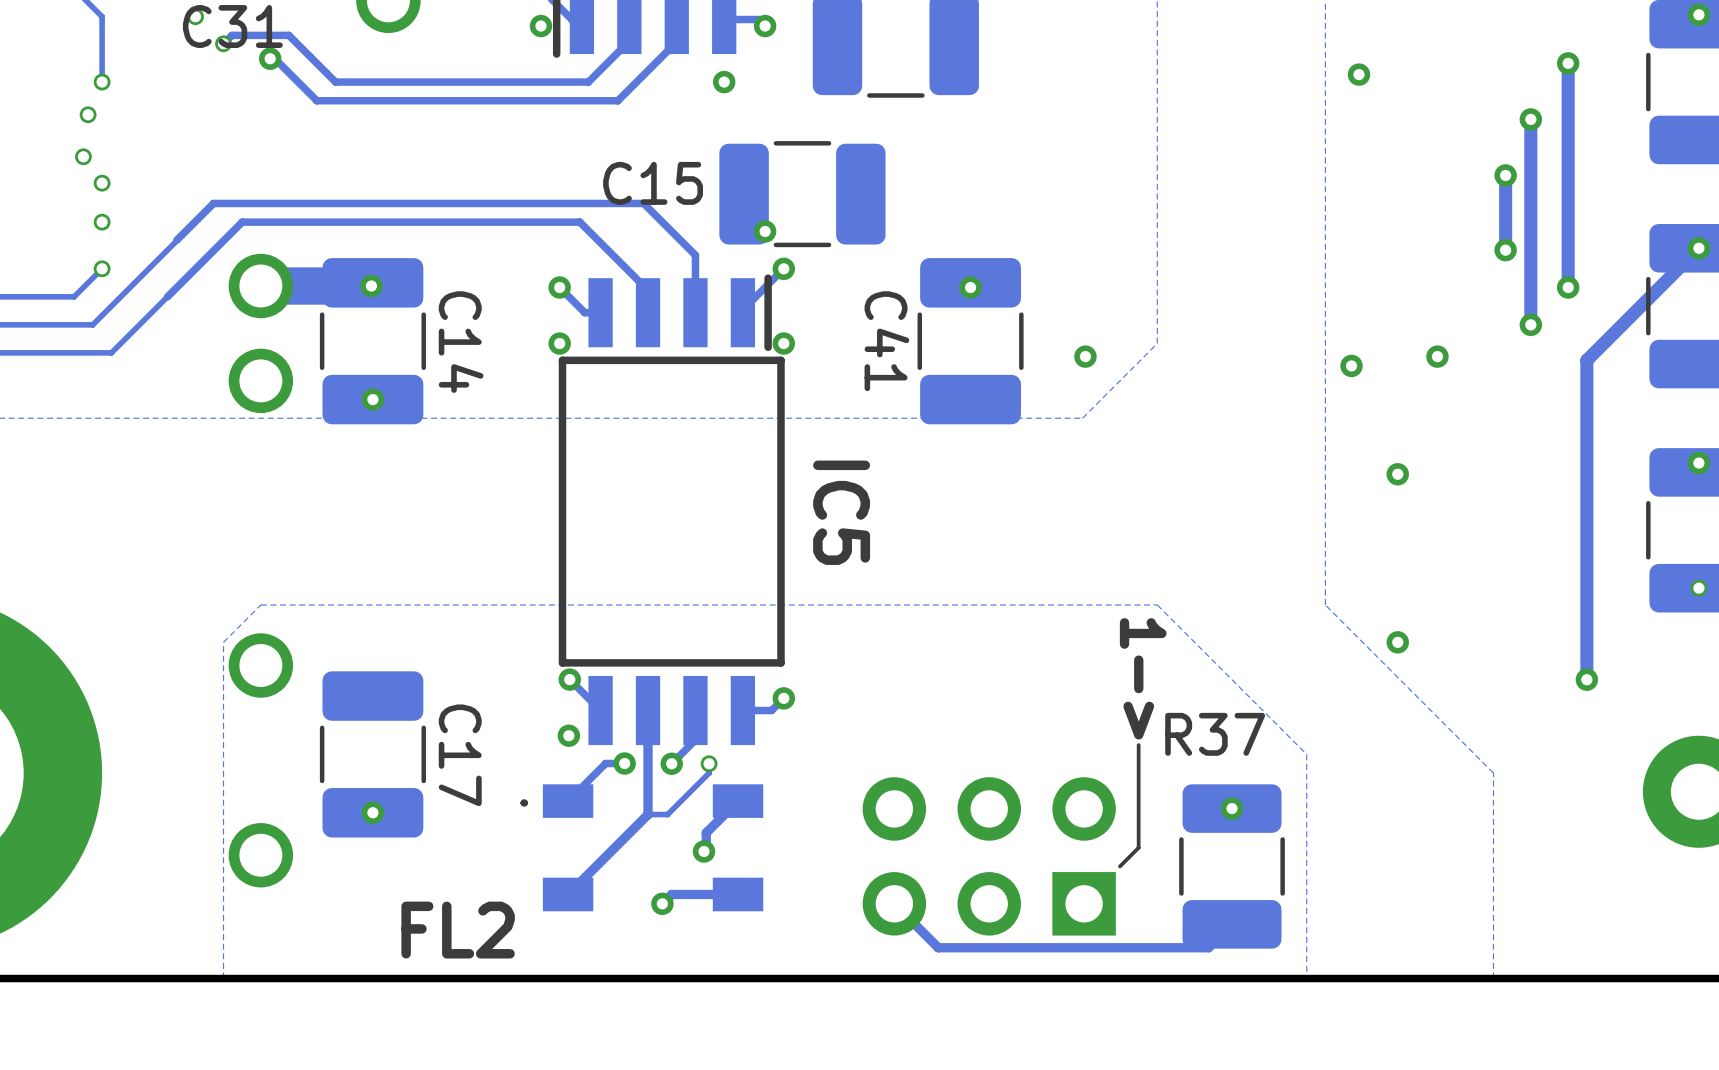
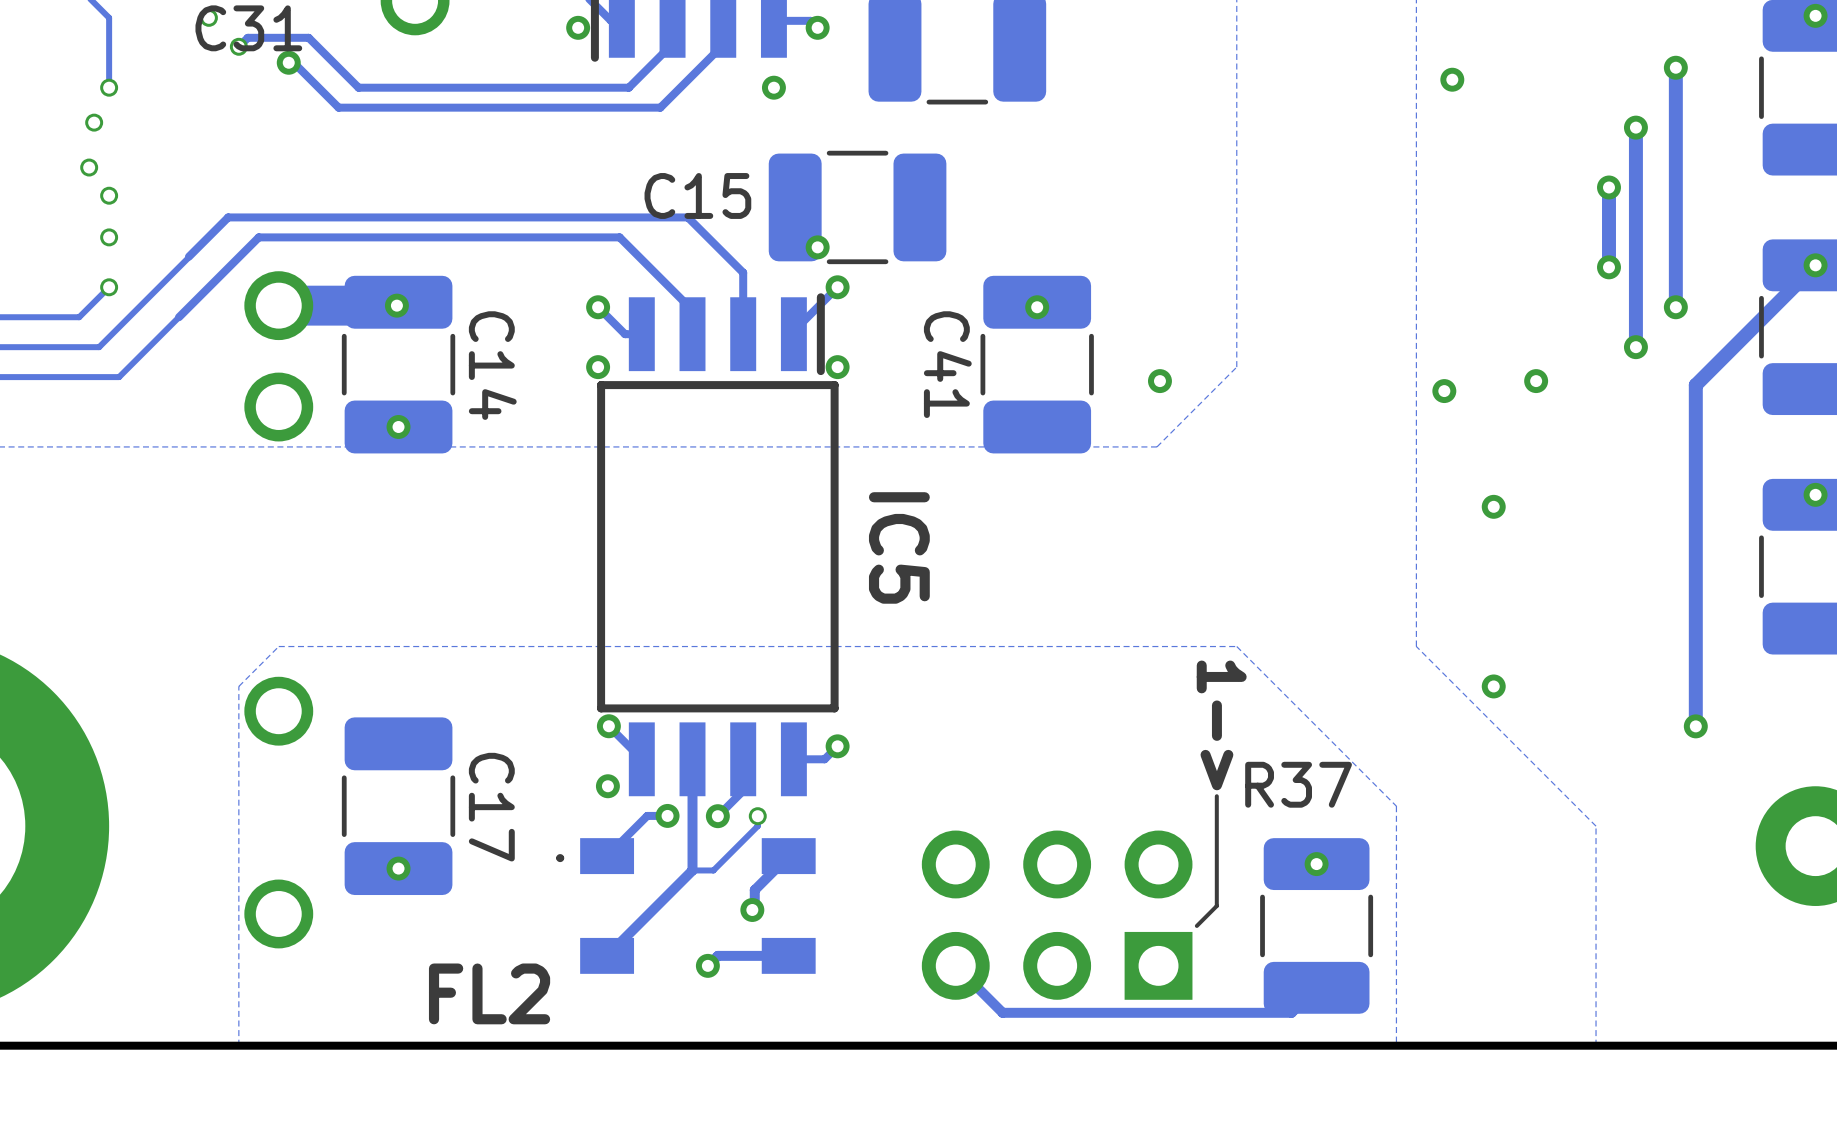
via: (1698, 588) -> none

